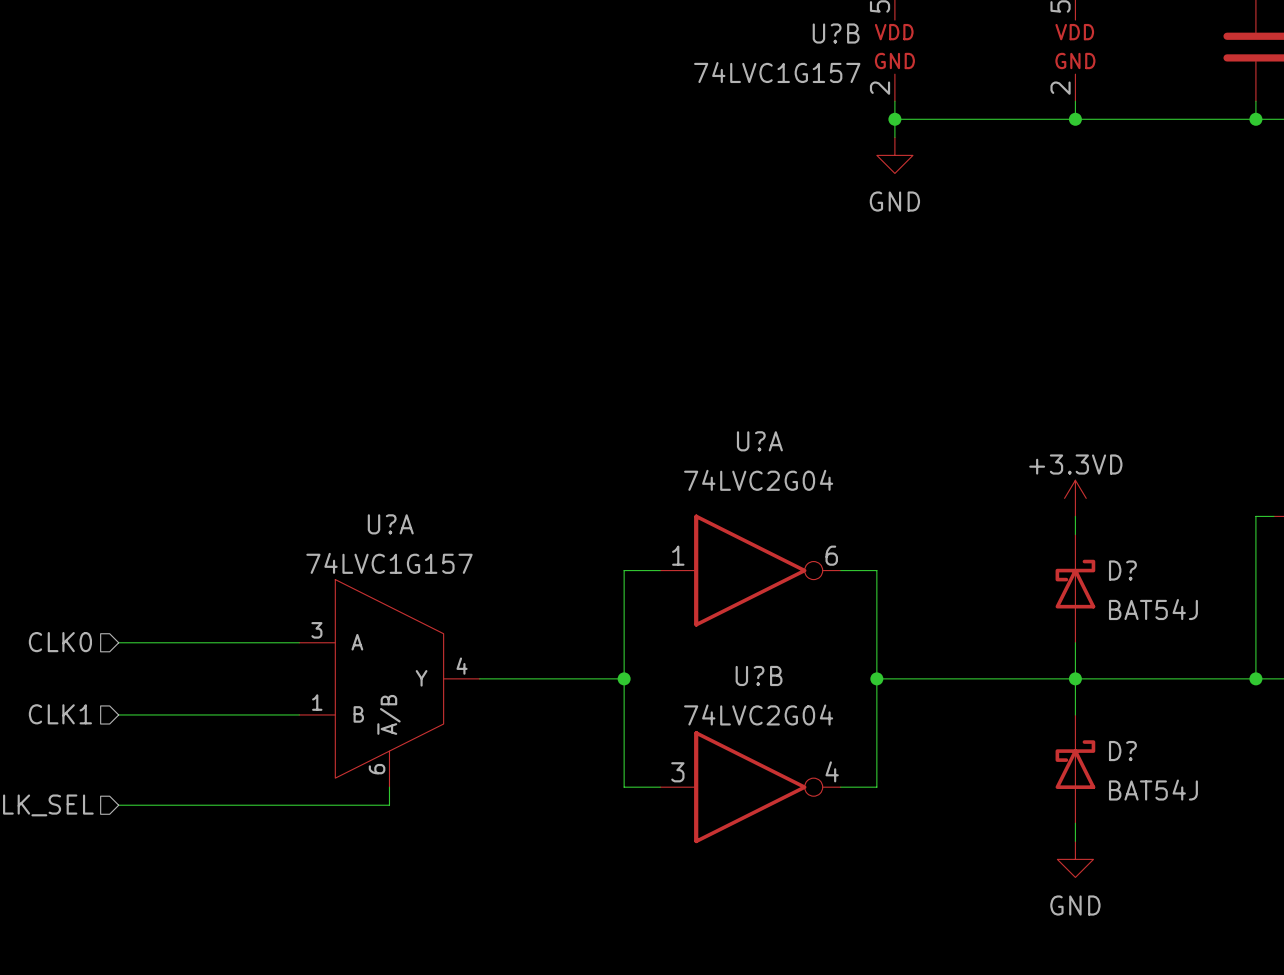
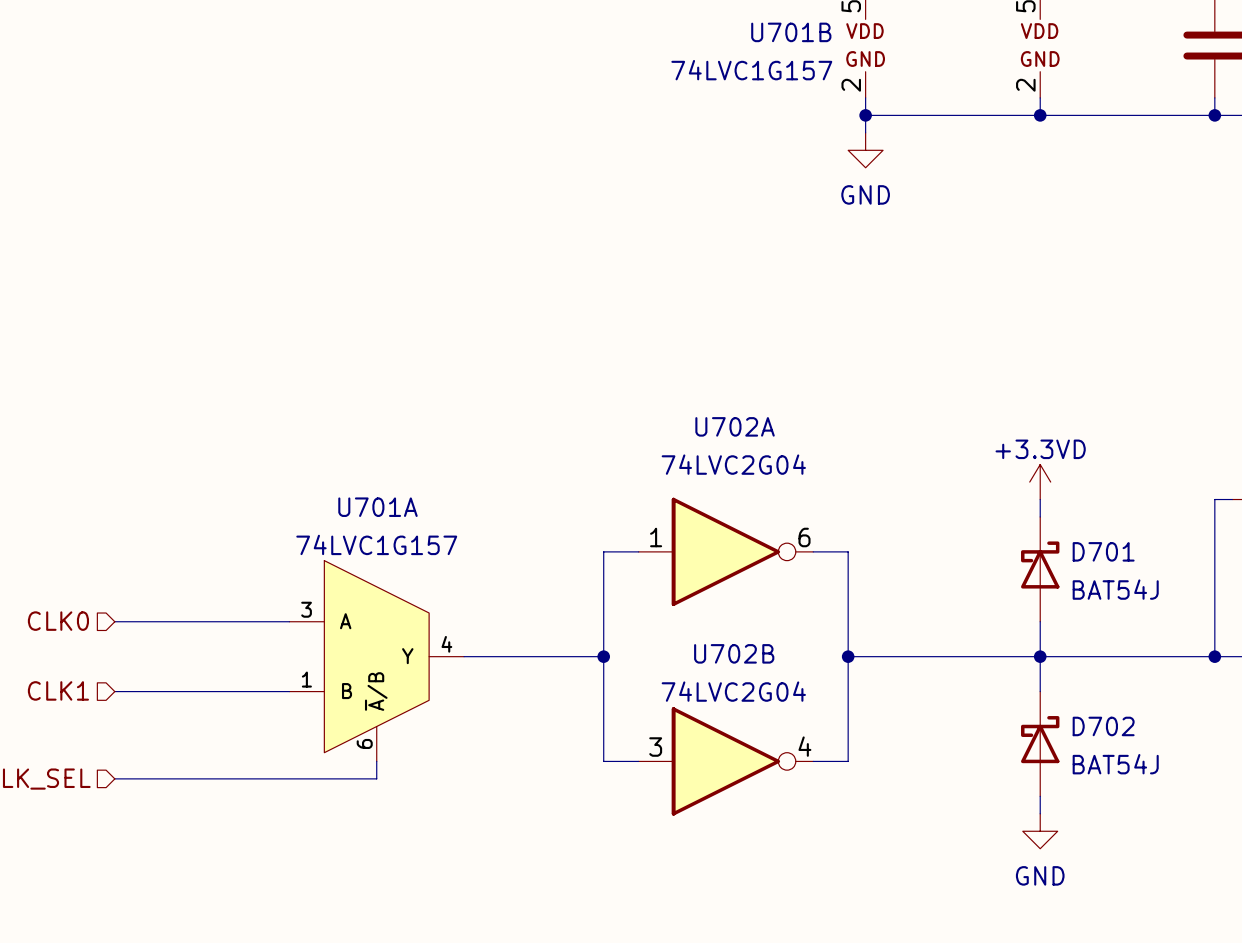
U?B name: U?B (836, 33) -> U701B (791, 32)
U?A name: U?A (759, 441) -> U702A (735, 426)
U?A name: U?A (390, 524) -> U701A (377, 507)
D? name: D? (1122, 570) -> D701 (1103, 551)
U?B name: U?B (759, 675) -> U702B (734, 653)
D? name: D? (1122, 751) -> D702 (1103, 726)

